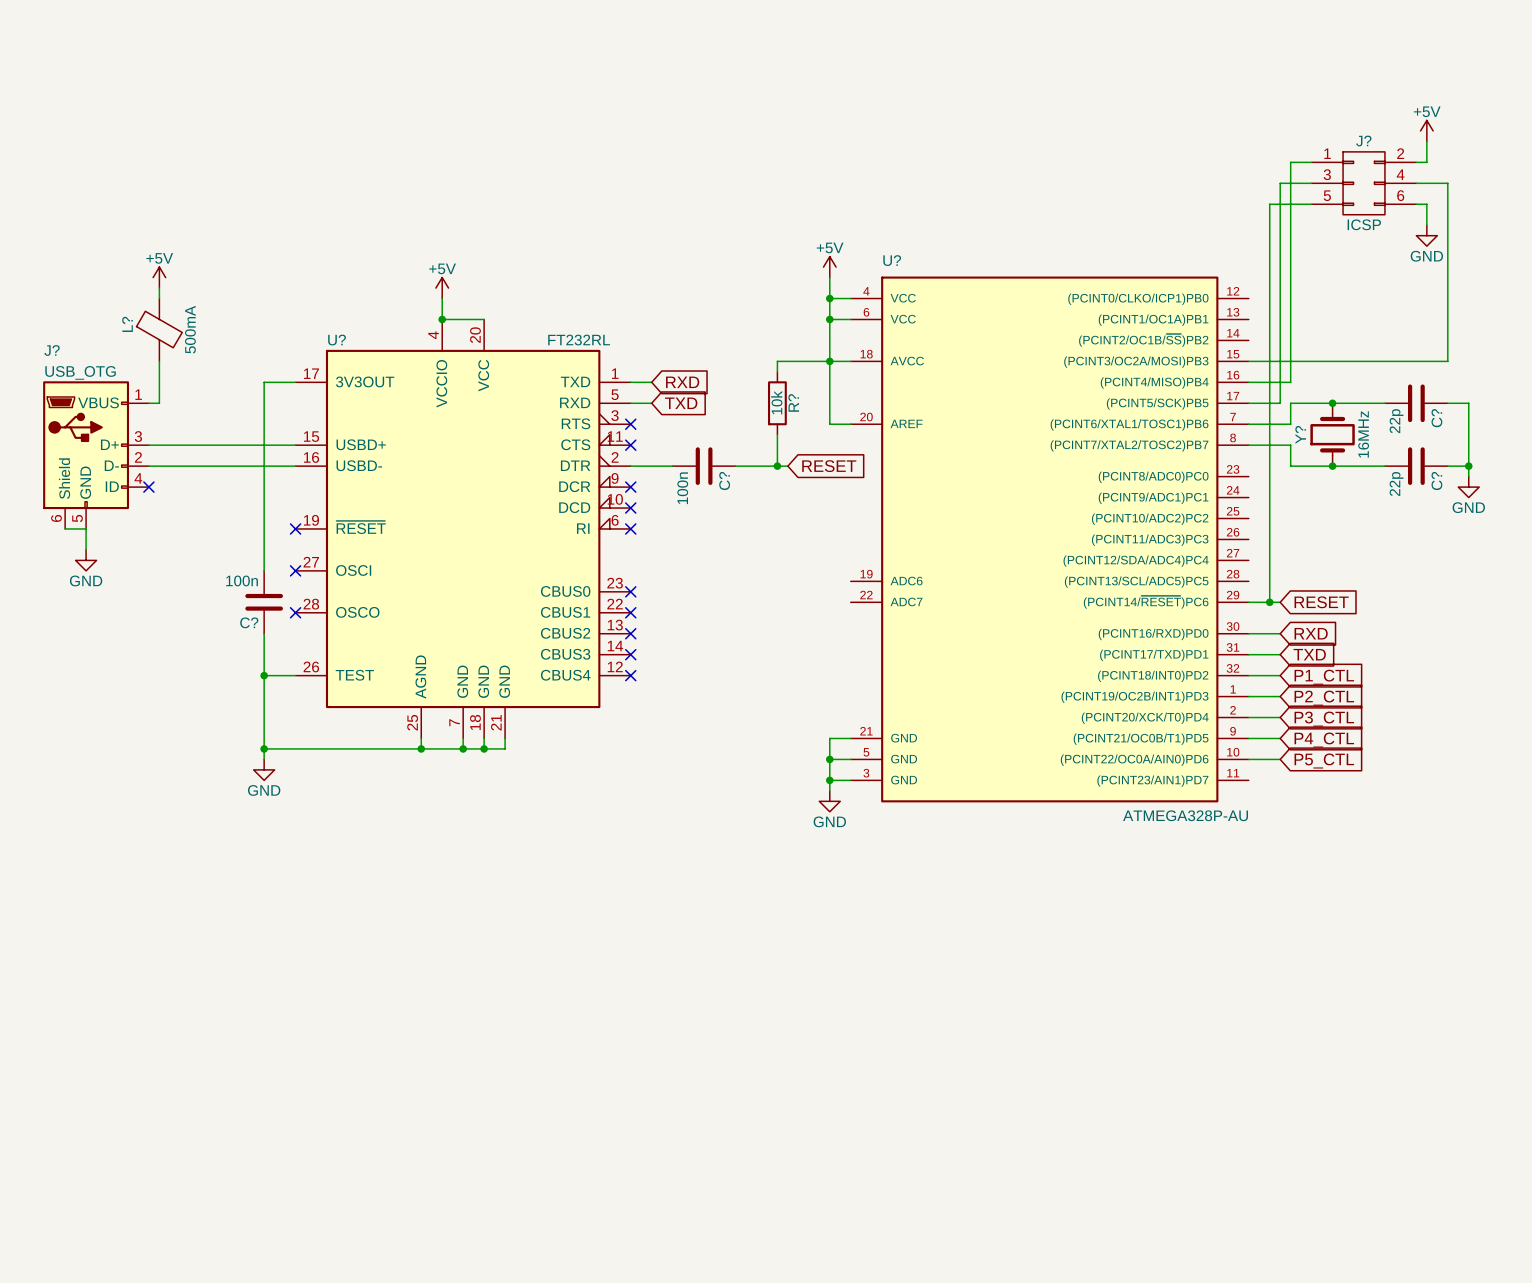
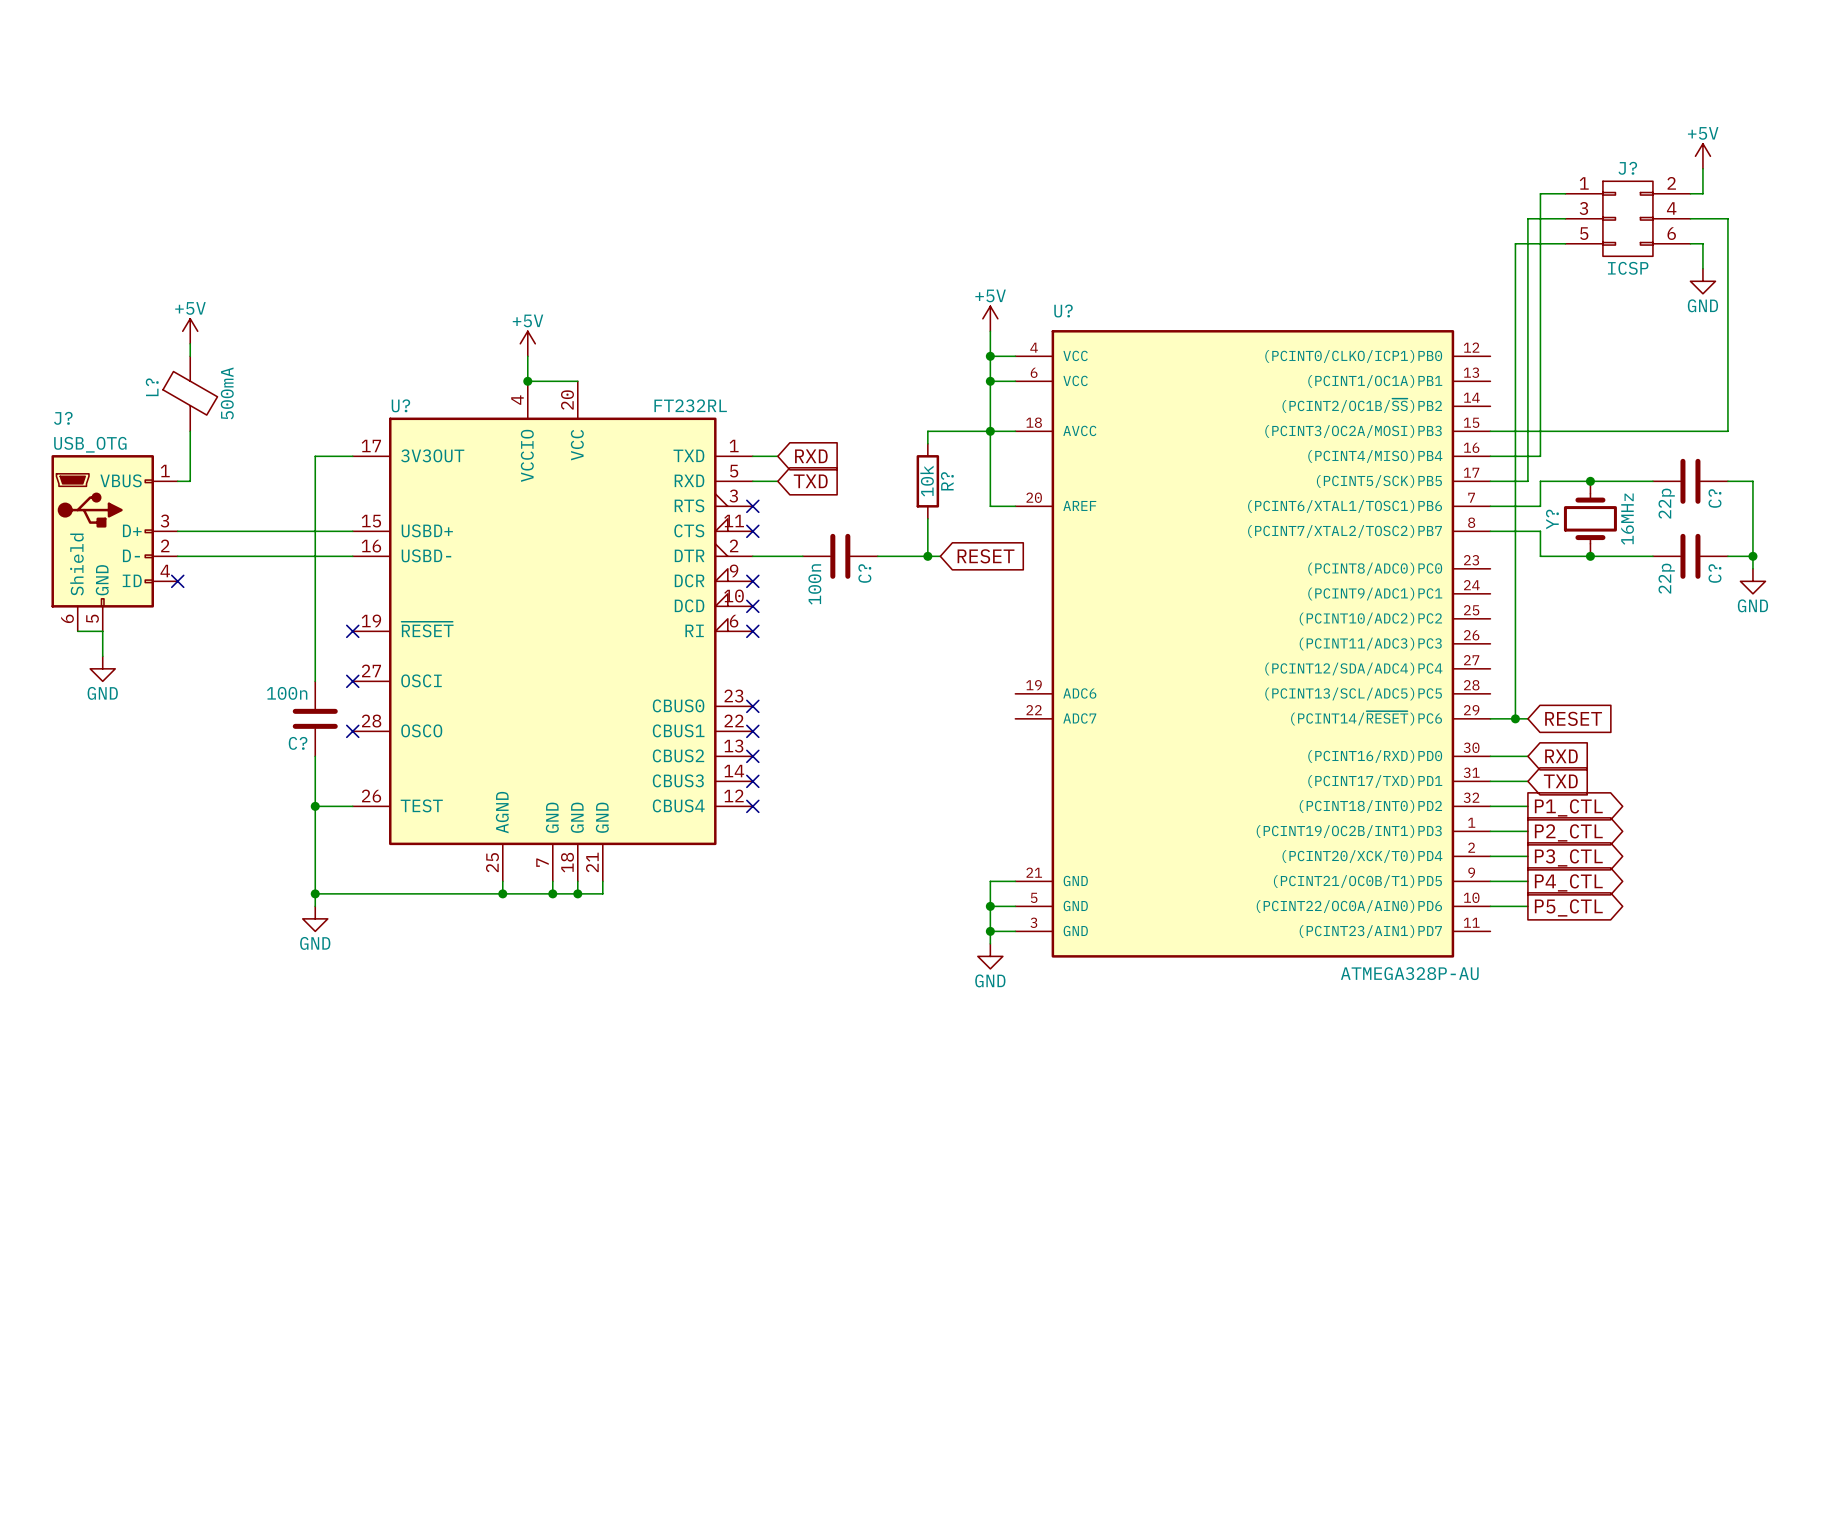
global label shape: input (1324, 677) -> output (1568, 807)
global label shape: input (1324, 698) -> output (1568, 832)
global label shape: input (1324, 719) -> output (1568, 857)
global label shape: input (1324, 740) -> output (1568, 882)
global label shape: input (1324, 761) -> output (1568, 907)

